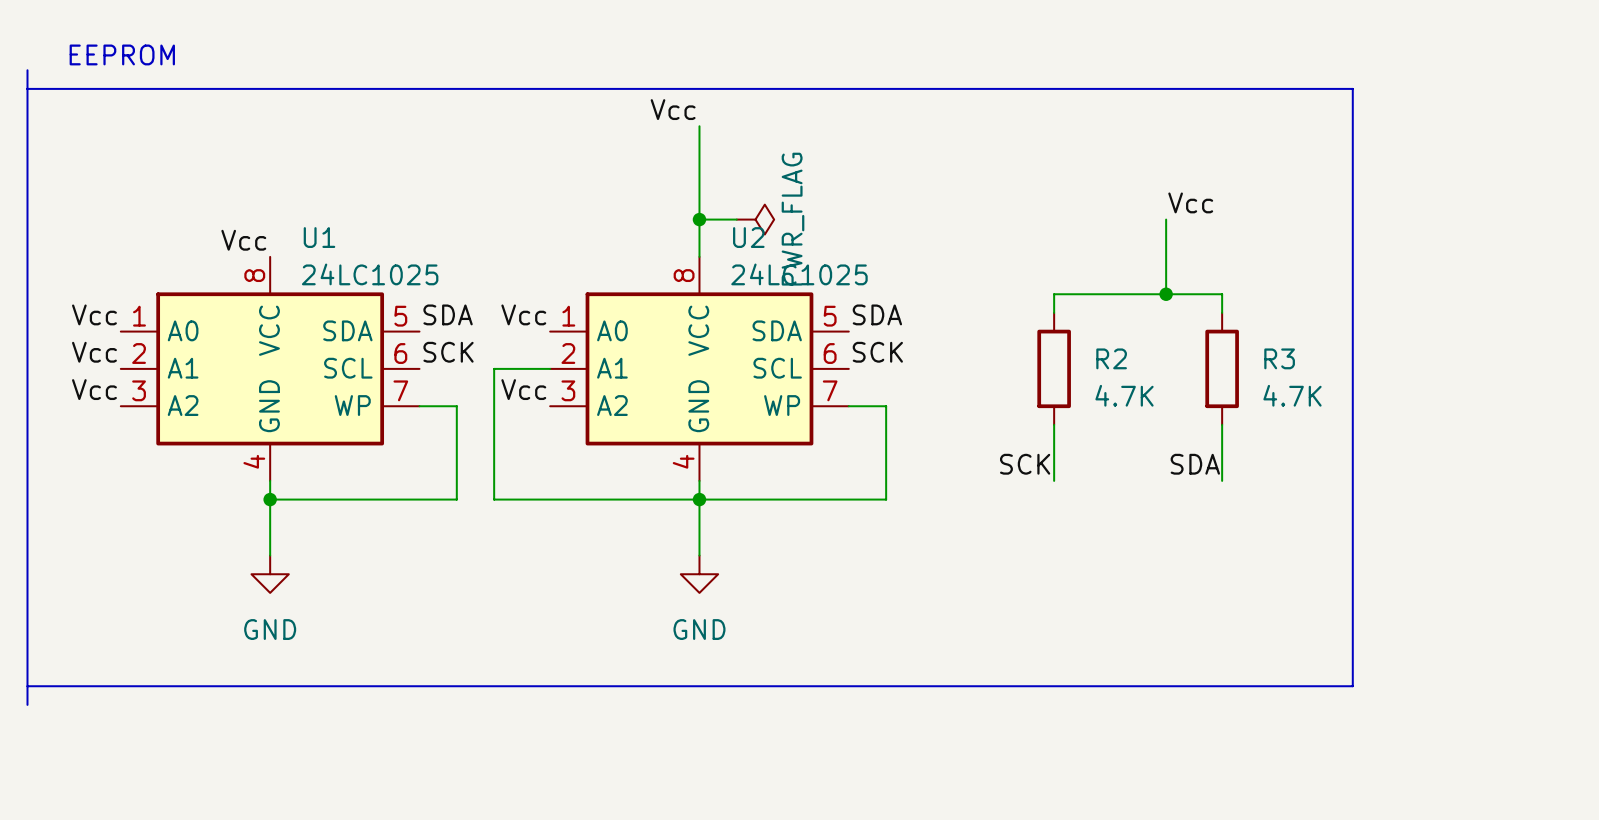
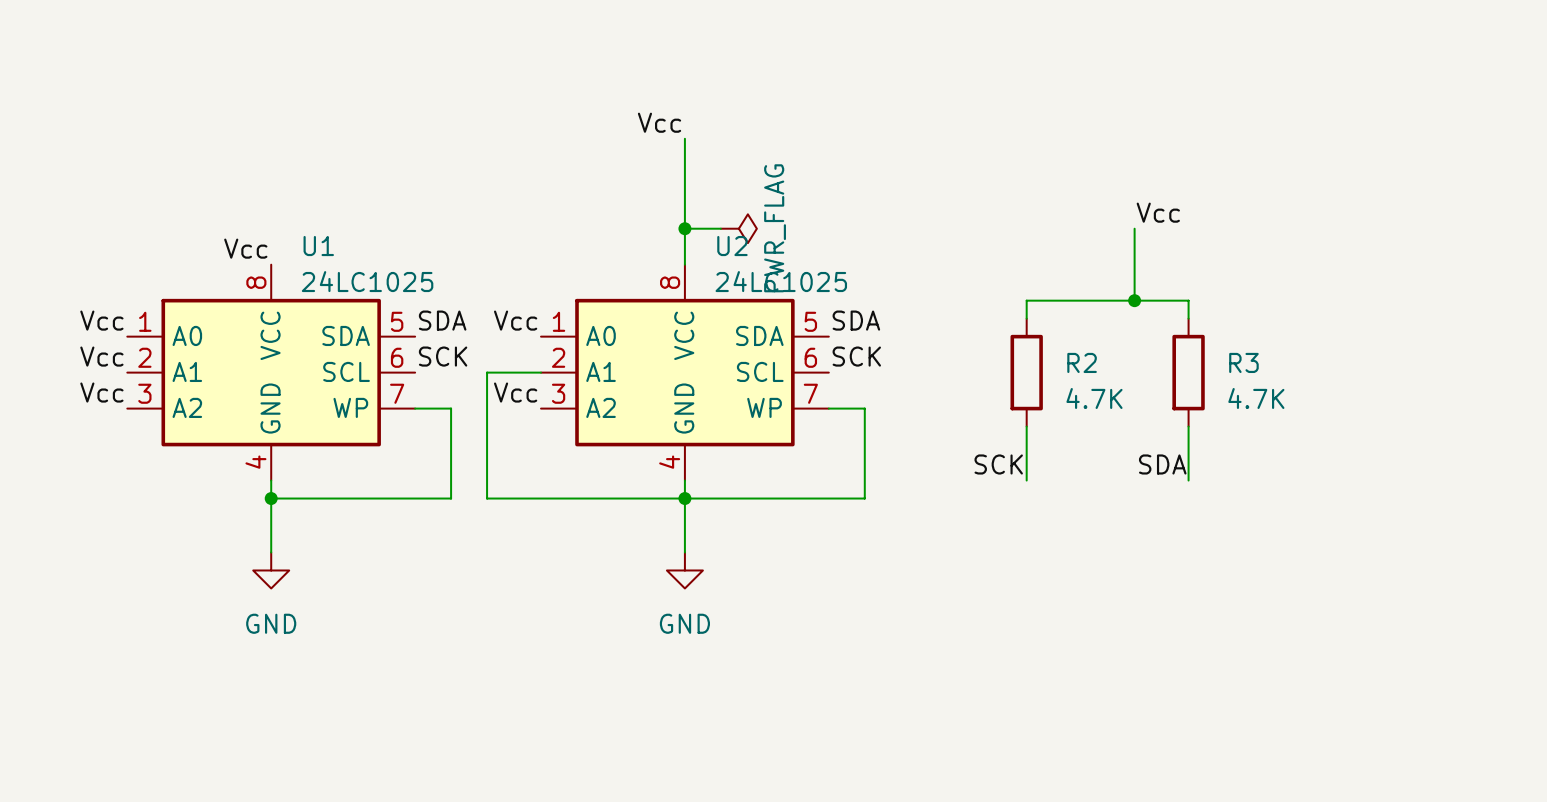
text: EEPROM (122, 54) -> none
line: (27, 70) (27, 704) -> none
line: (27, 88) (1352, 88) (1352, 686) (27, 686) -> none

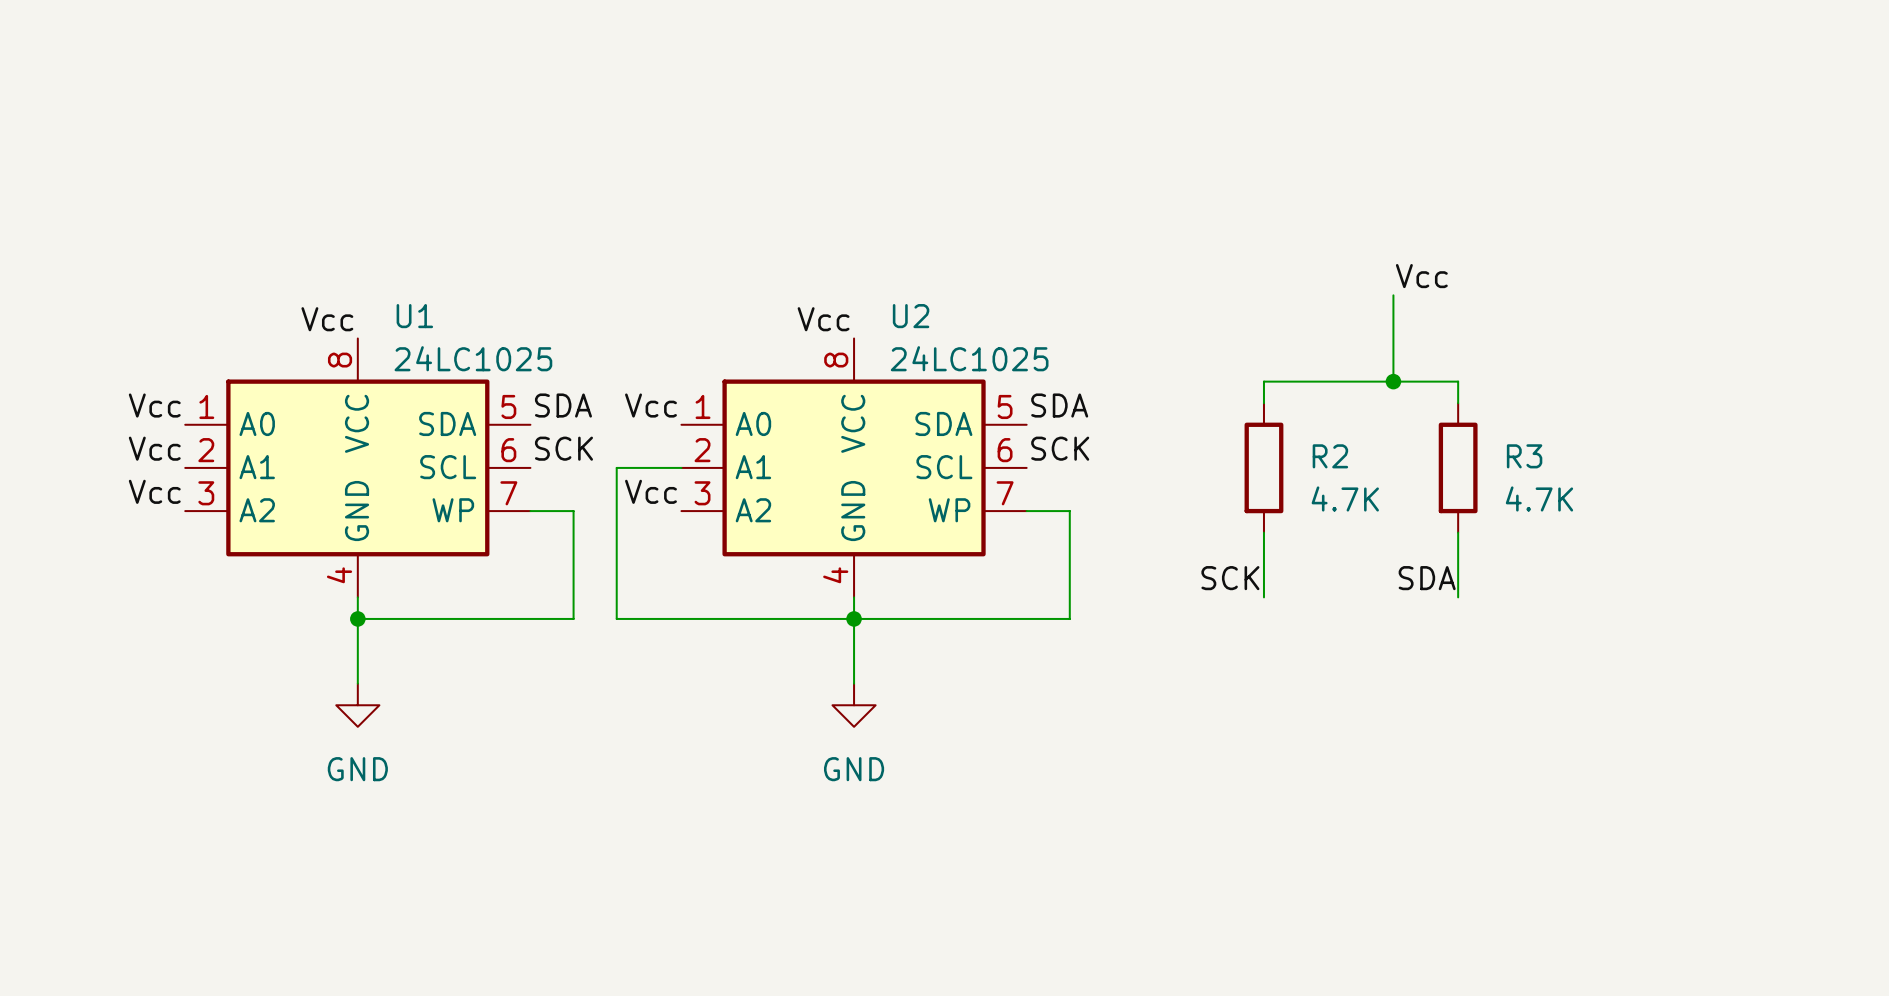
label position: Vcc (659, 122) -> Vcc (823, 319)
wire: (684, 138) (684, 264) -> none
wire: (684, 228) (720, 228) -> none
junction: (684, 228) -> none
power symbol: PWR_FLAG (738, 228) -> none

